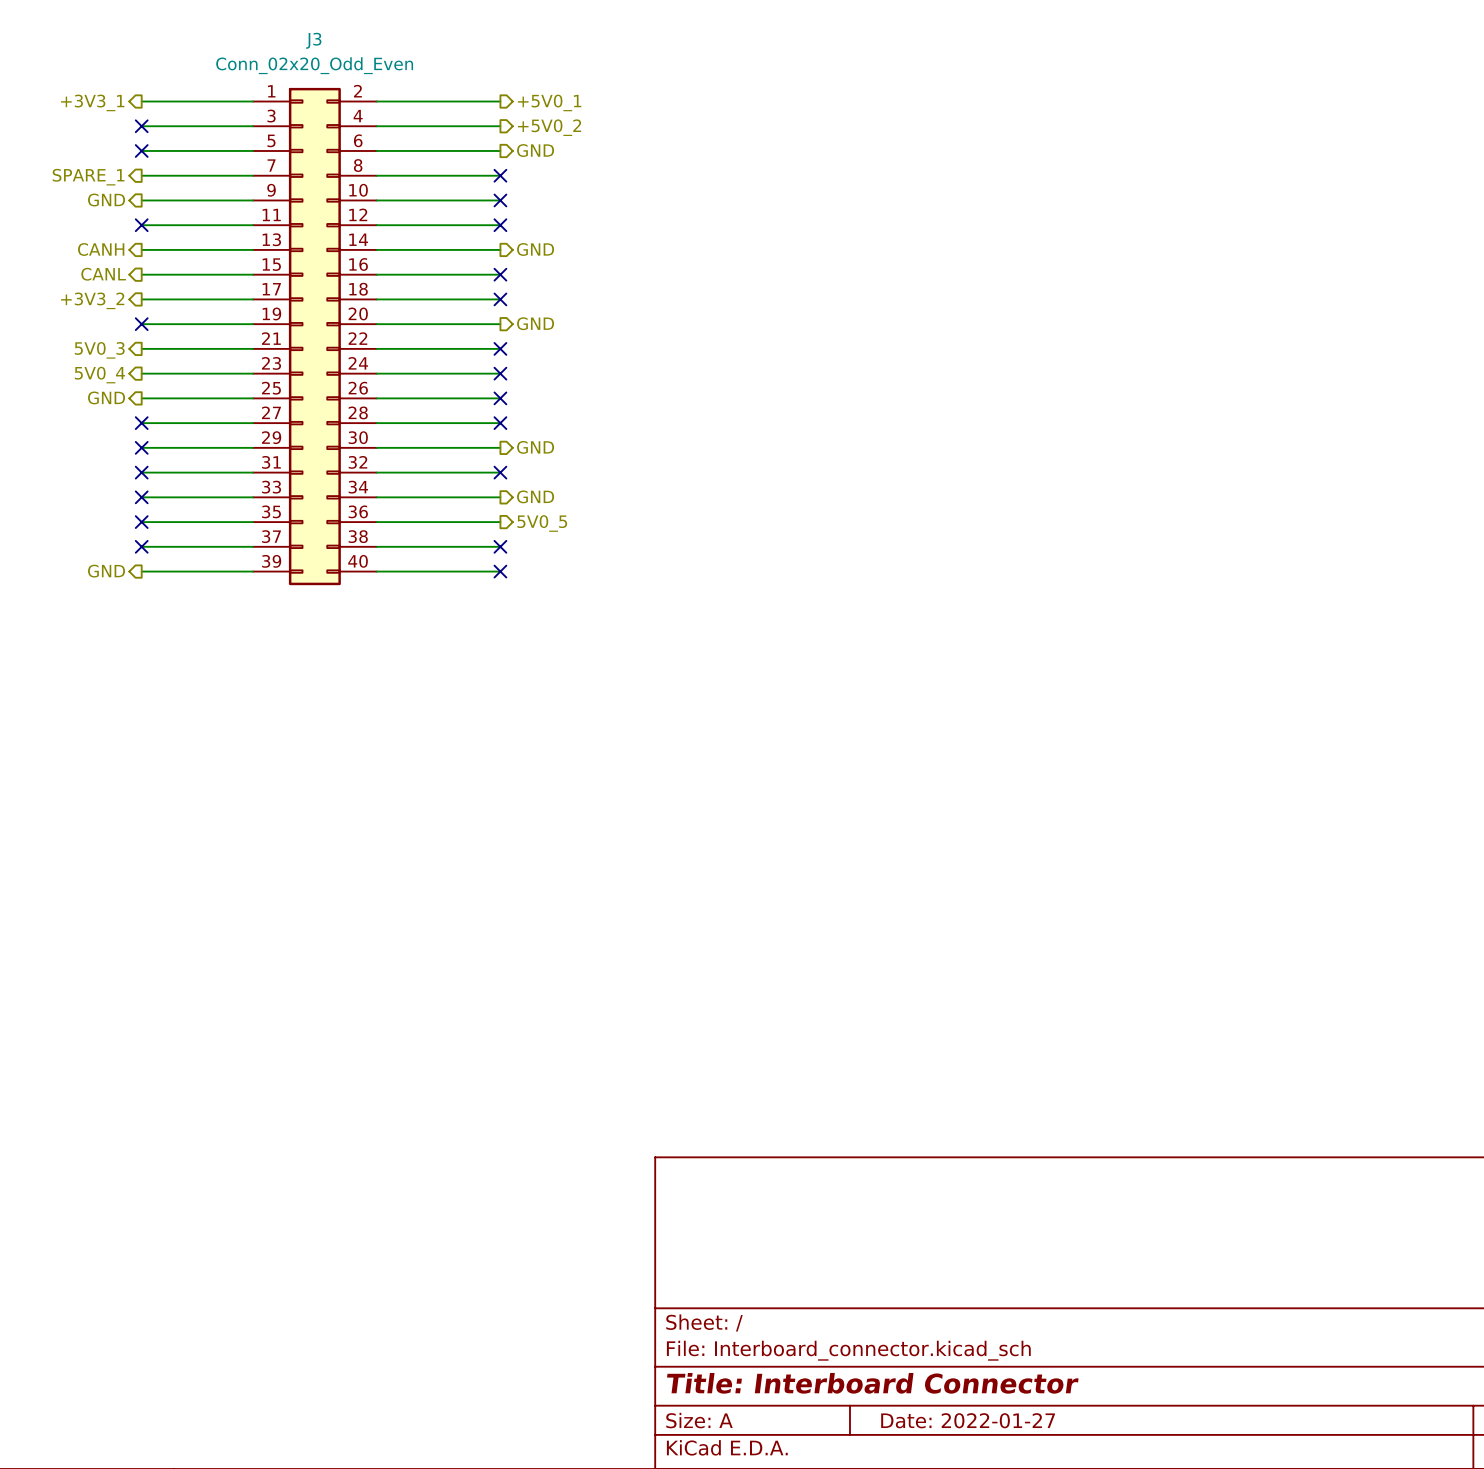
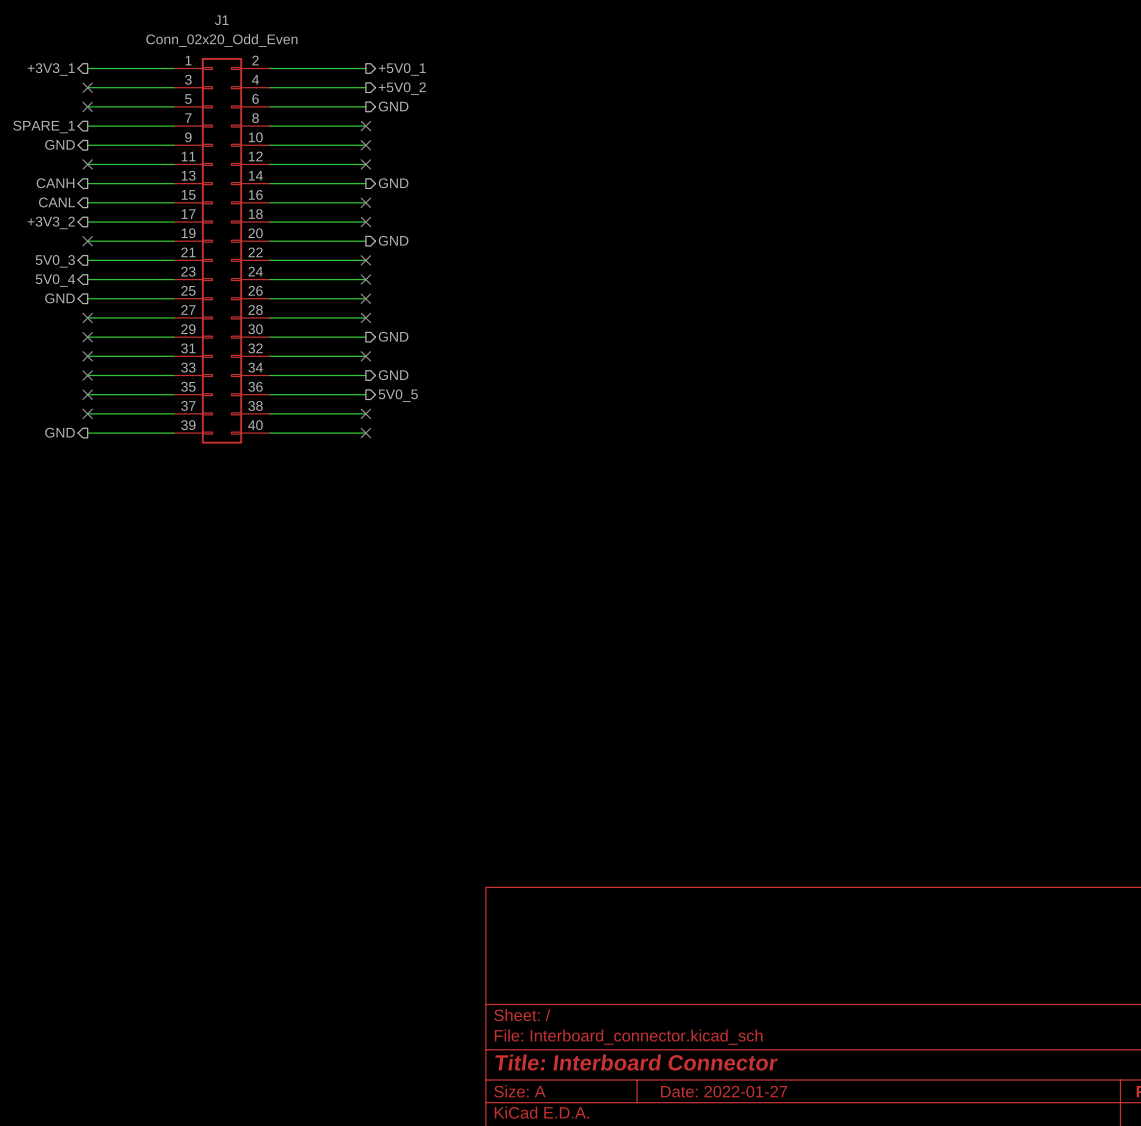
J3 name: J3 (313, 40) -> J1 (221, 20)

